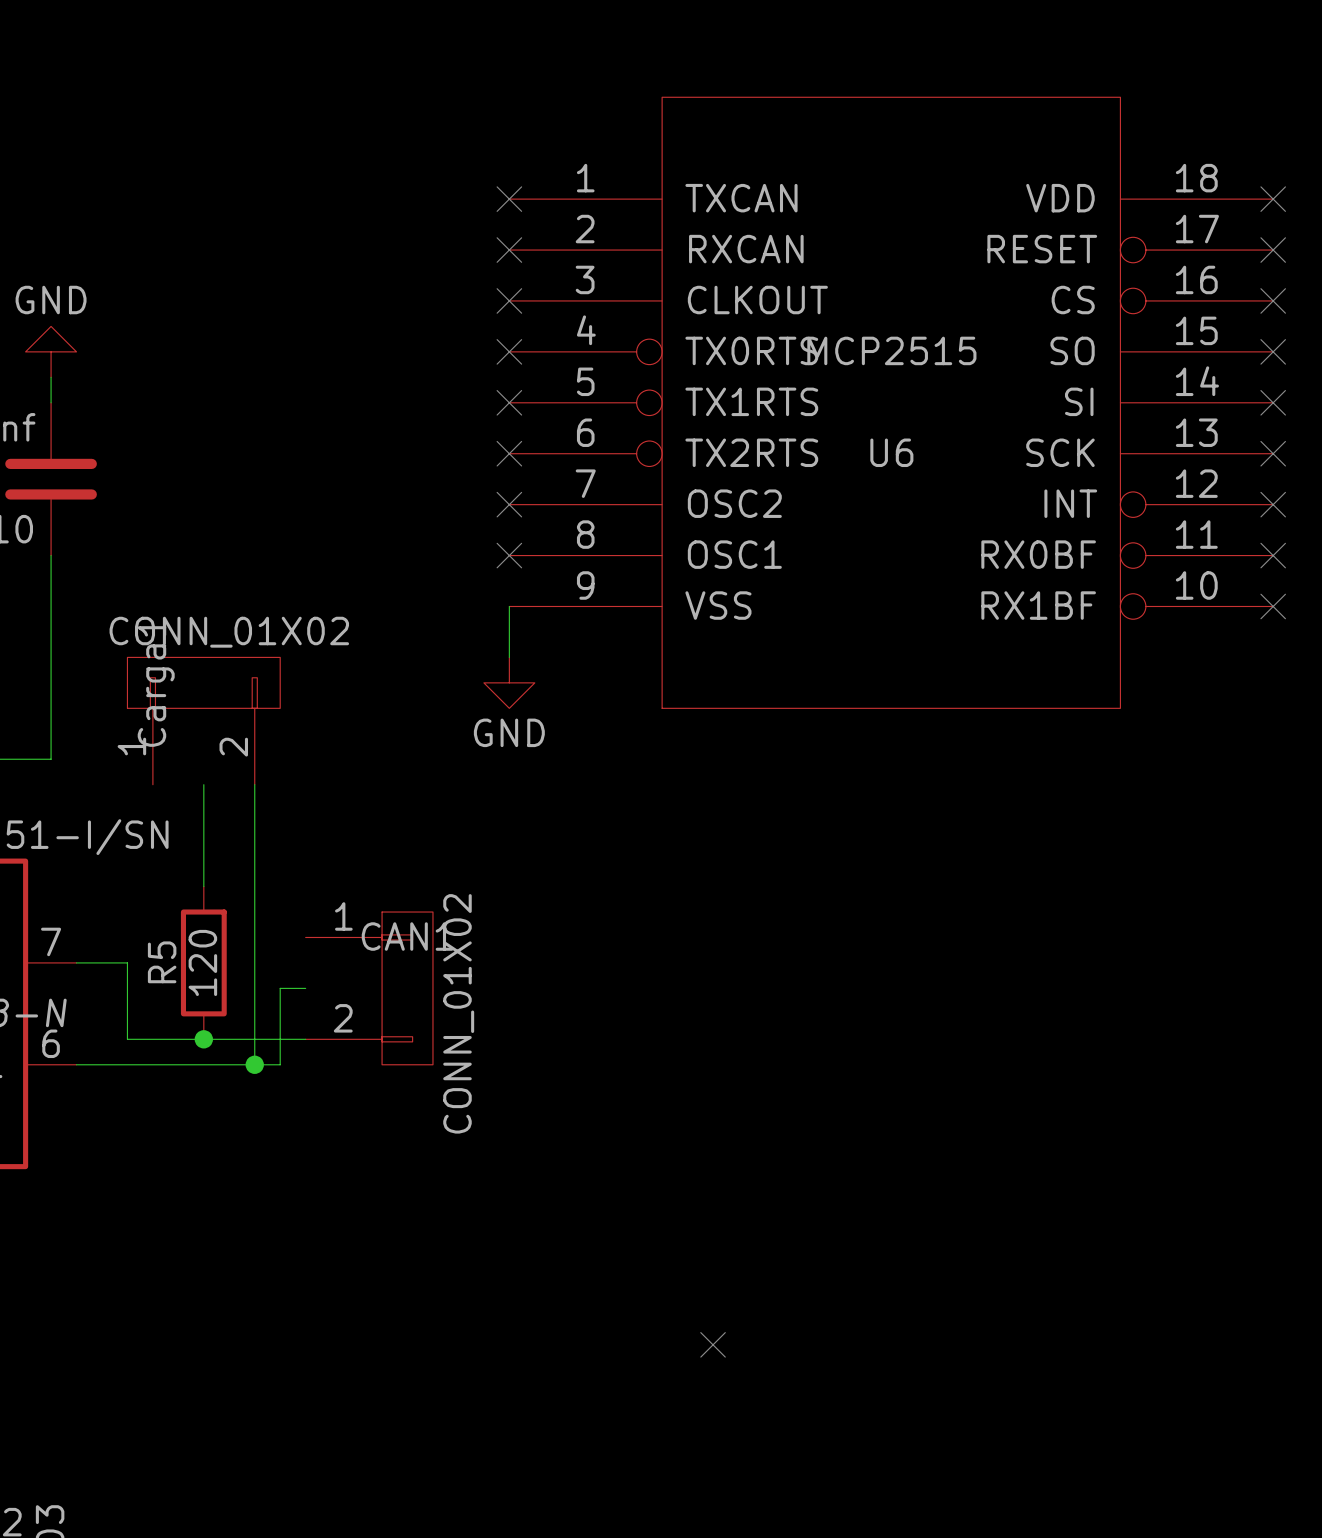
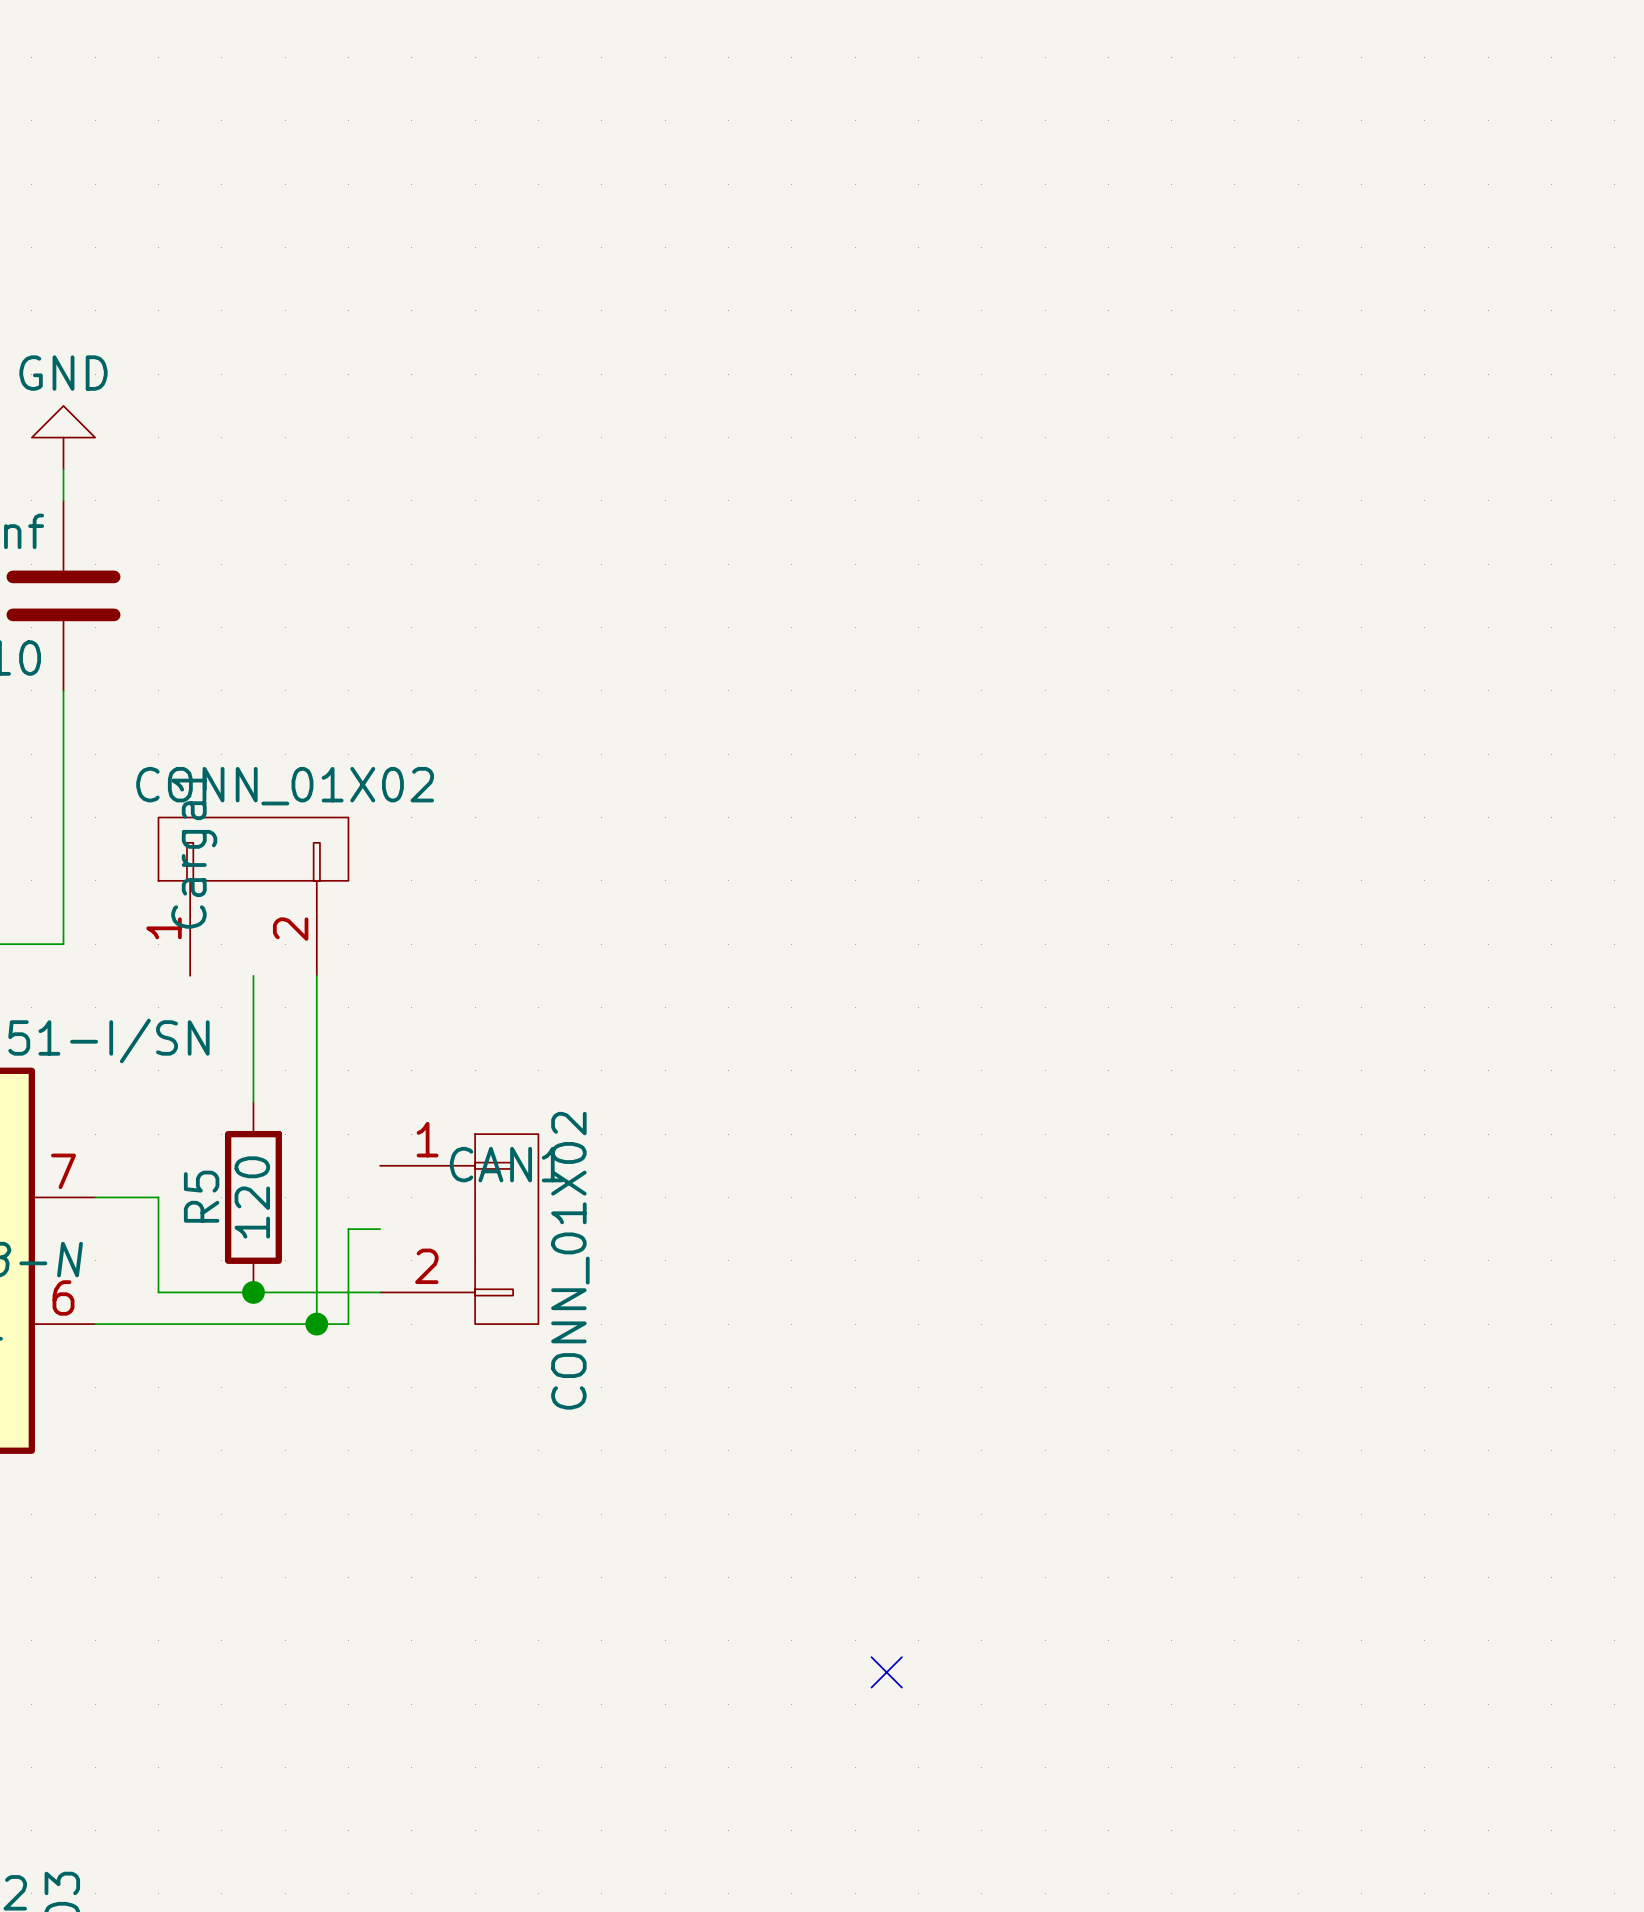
no-connect mark: (509, 199) -> none
no-connect mark: (1273, 199) -> none
no-connect mark: (509, 250) -> none
no-connect mark: (1273, 250) -> none
no-connect mark: (509, 300) -> none
no-connect mark: (1273, 300) -> none
no-connect mark: (509, 351) -> none
no-connect mark: (1273, 351) -> none
no-connect mark: (509, 402) -> none
U6: MCP2515 (891, 402) -> none
no-connect mark: (1273, 402) -> none
no-connect mark: (509, 453) -> none
no-connect mark: (1273, 453) -> none
no-connect mark: (509, 504) -> none
no-connect mark: (1273, 504) -> none
no-connect mark: (509, 555) -> none
no-connect mark: (1273, 555) -> none
wire: (509, 606) (509, 657) -> none
no-connect mark: (1273, 606) -> none
power symbol: GND (509, 682) -> none

